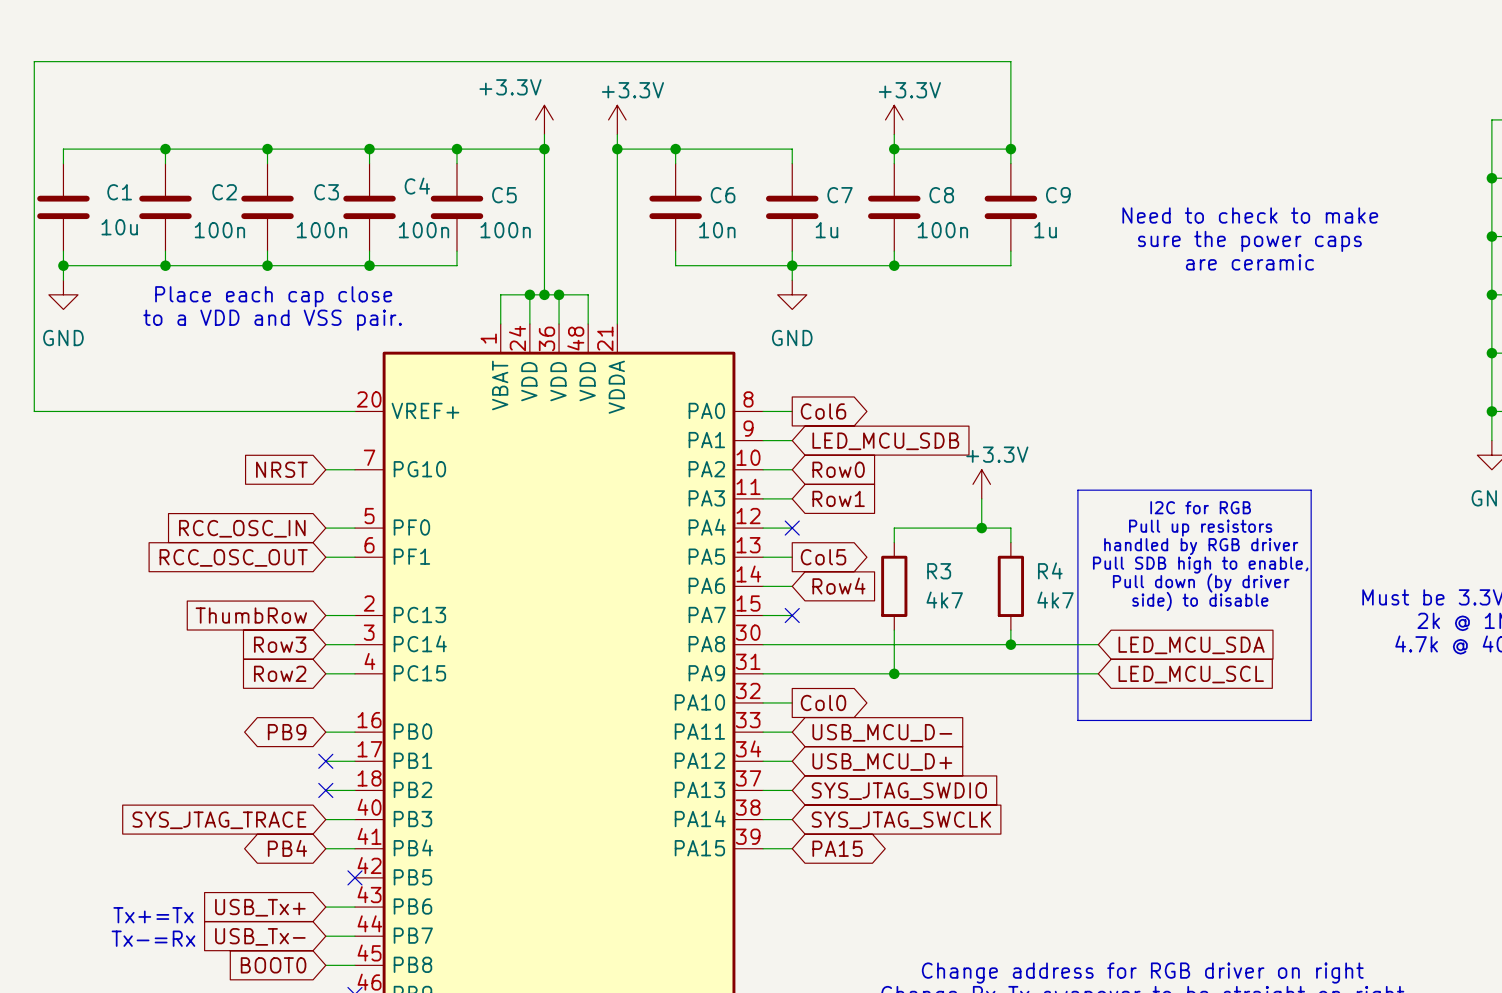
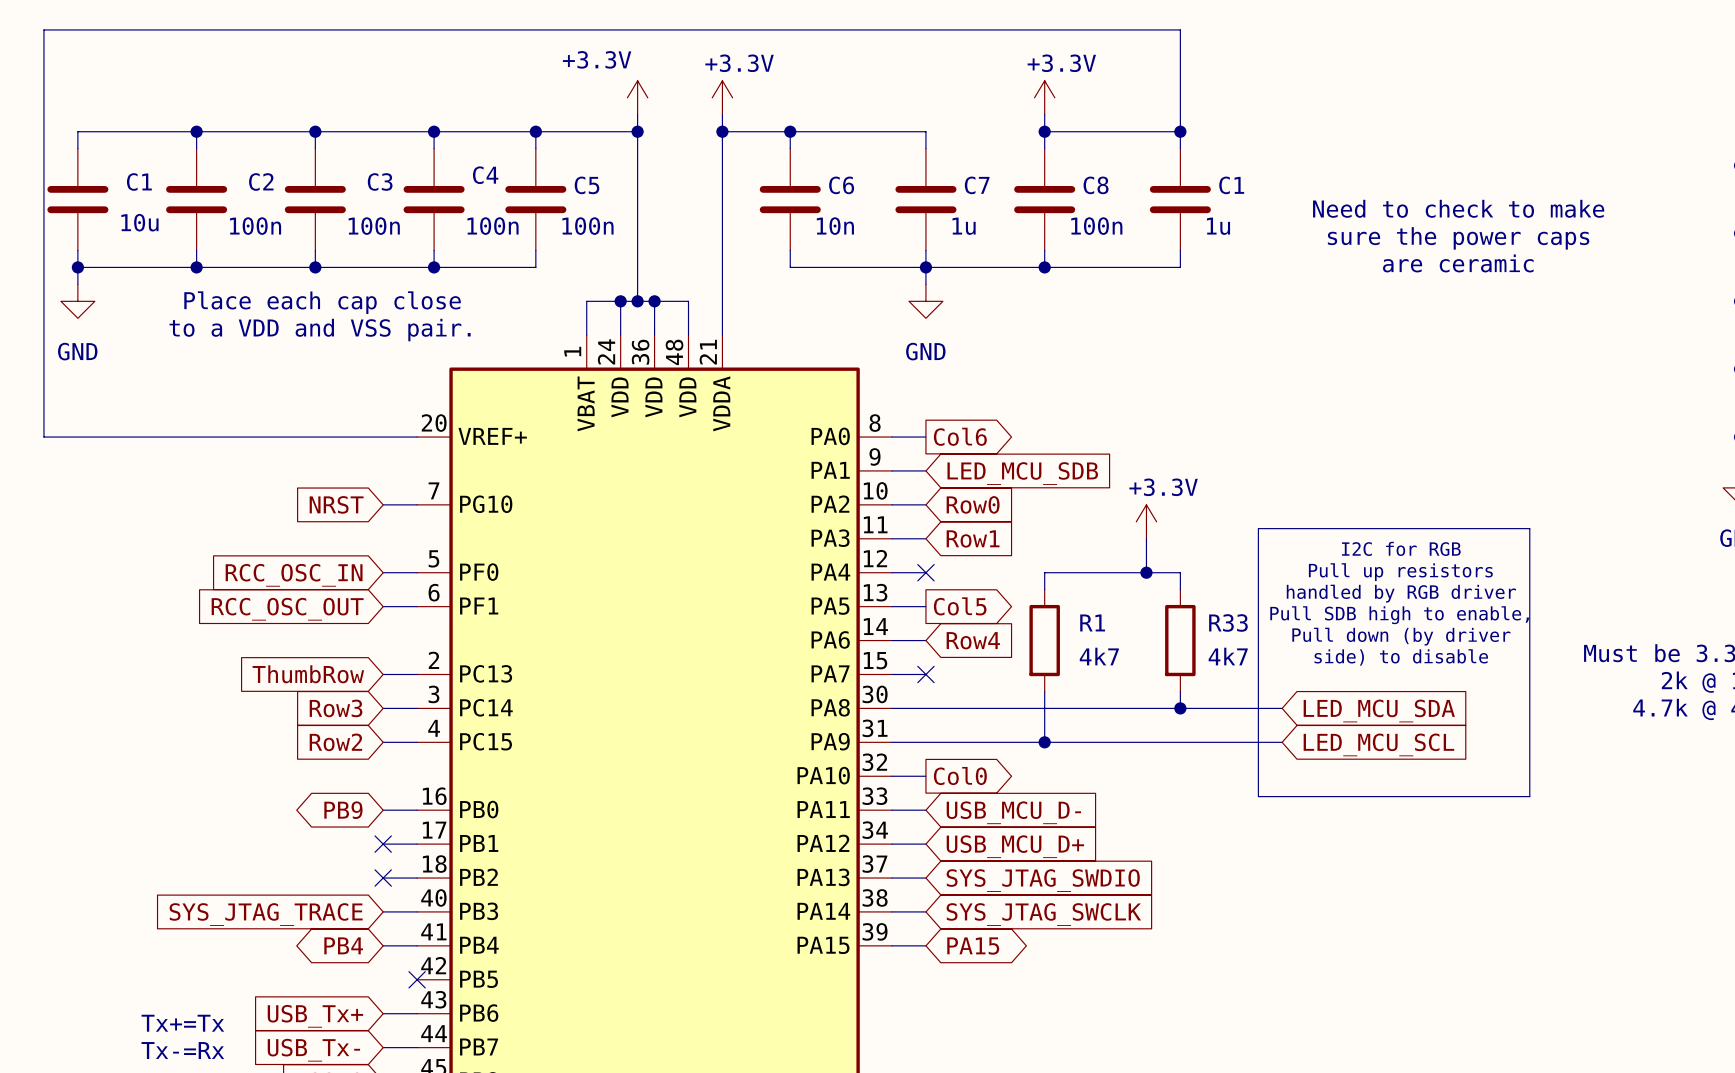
C9 name: C9 (1058, 195) -> C1 (1231, 185)
R4 name: R4 (1050, 570) -> R33 (1228, 622)
R3 name: R3 (939, 571) -> R1 (1092, 622)

